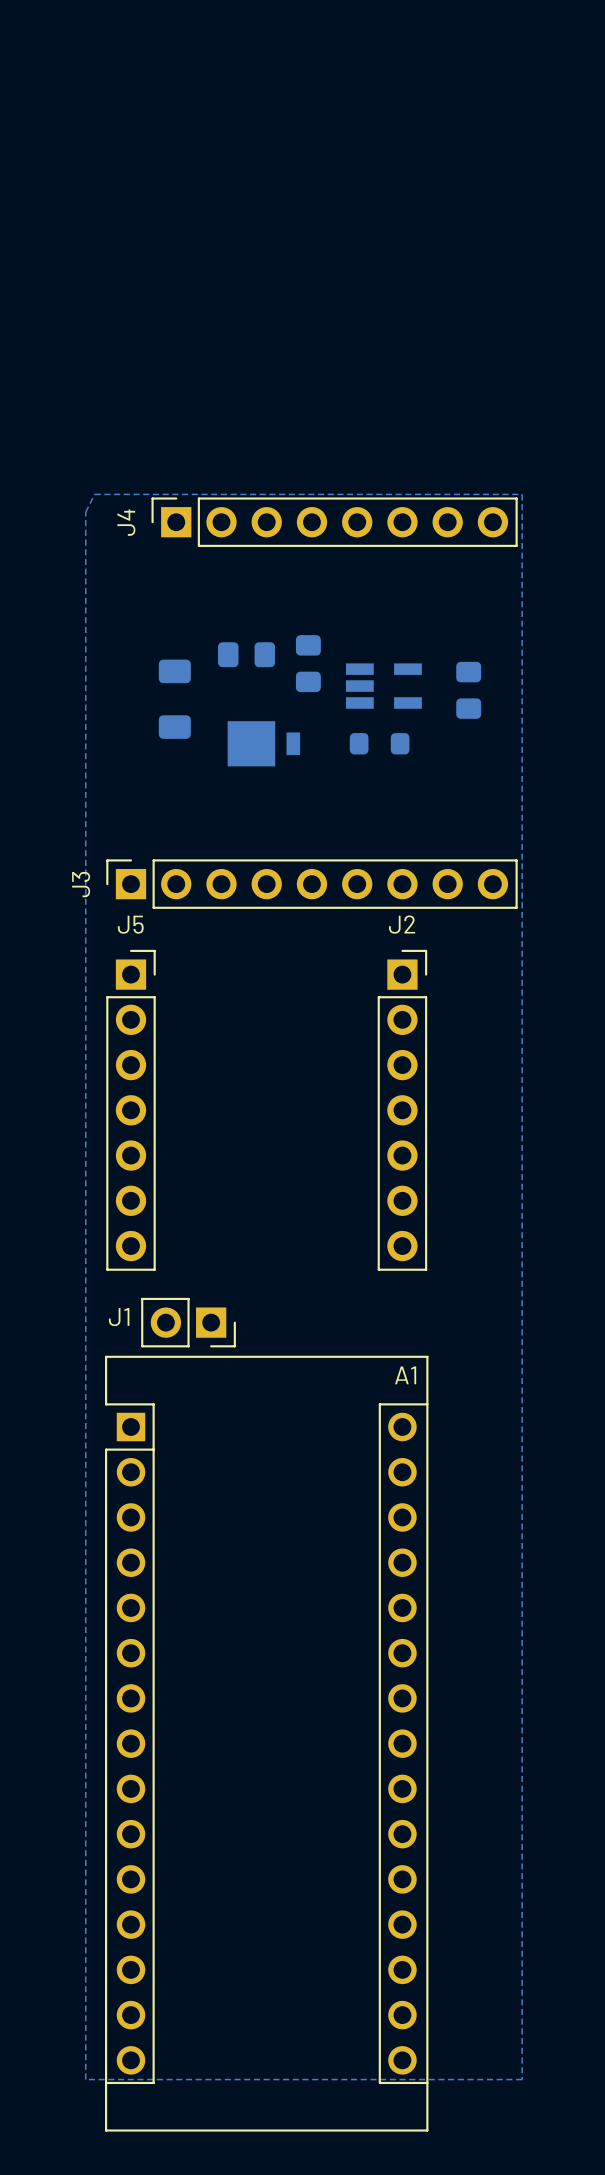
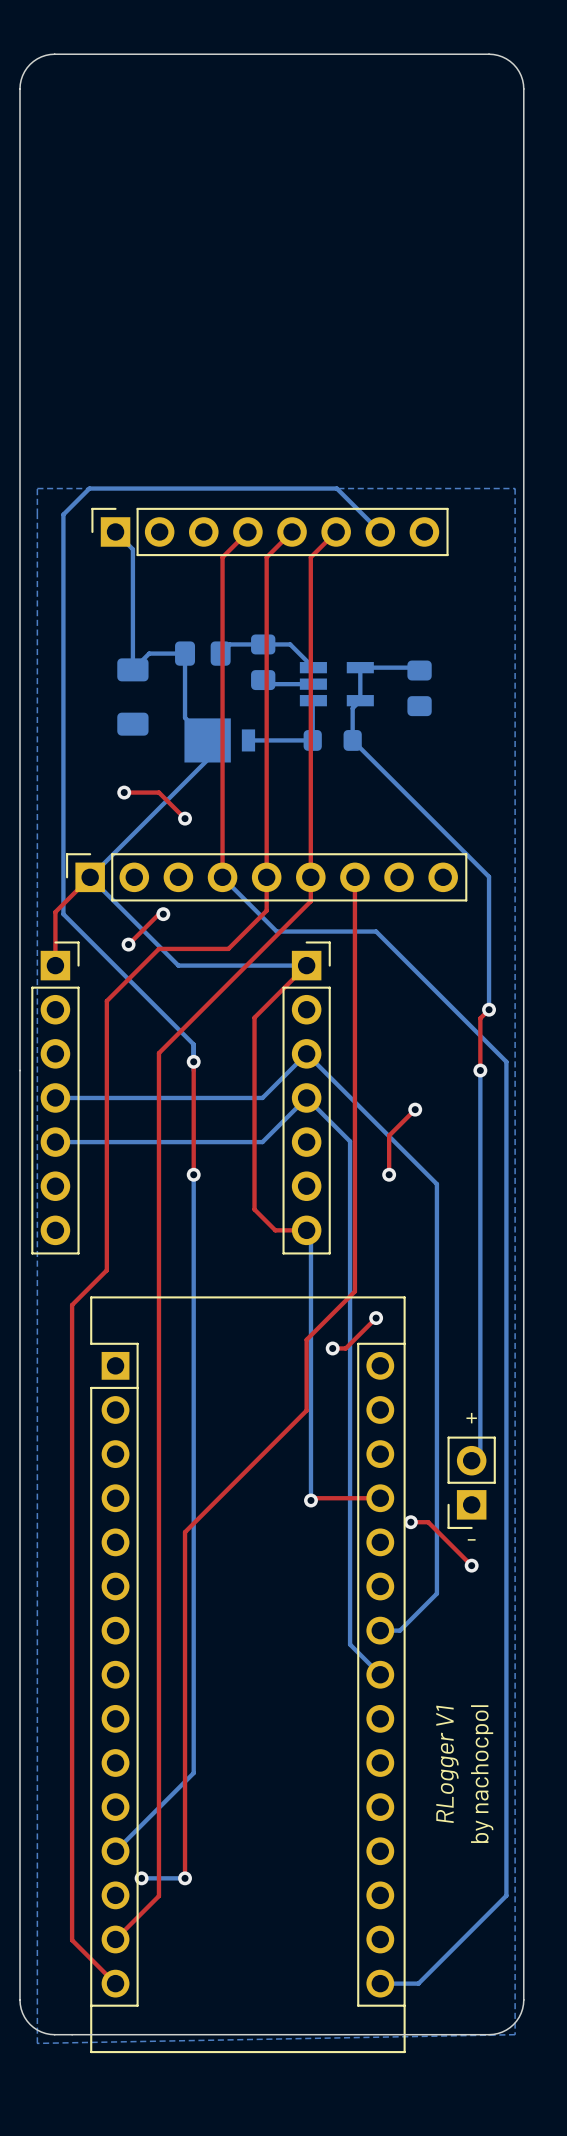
board edge: none -> (54, 54) (489, 54) (502, 56) (510, 61) (519, 71) (522, 79) (523, 1999) (521, 2013) (516, 2021) (506, 2030) (498, 2033) (54, 2034) (41, 2032) (33, 2027) (24, 2017) (21, 2008) (19, 88) (22, 75) (30, 64) (41, 56) (54, 54)
bottom zone outline: (94, 494) (85, 512) (85, 2079) (522, 2079) (522, 494) (94, 494) -> (37, 488) (37, 2043) (515, 2034) (515, 488) (37, 488)
J4: (334, 522) -> none
bottom track: none -> (115, 531) (132, 549) (132, 669) (149, 653) (185, 653) (185, 717) (207, 740) (207, 759) (90, 877) (178, 965) (306, 965)
top track: none -> (247, 531) (222, 557) (222, 877)
part: none -> (269, 531)
top track: none -> (292, 531) (266, 557) (266, 910) (228, 948) (158, 948) (106, 1001) (106, 1270) (72, 1305) (72, 1940) (115, 1983)
top track: none -> (336, 531) (310, 557) (310, 901) (158, 1053) (158, 1896) (115, 1939)
bottom track: none -> (380, 531) (336, 488) (89, 488) (63, 514) (63, 914) (193, 1044) (193, 1070)
bottom track: none -> (220, 653) (229, 644) (290, 644) (313, 667)
bottom track: none -> (419, 670) (416, 667) (360, 667) (360, 700) (352, 708) (352, 740) (489, 876) (489, 1009)
bottom track: none -> (263, 680) (267, 684) (313, 684)
bottom track: none -> (313, 700) (312, 740) (248, 740)
top track: none -> (124, 792) (158, 792) (185, 818)
via: none -> (124, 792)
via: none -> (185, 818)
J3 name: J3 (81, 884) -> none
top track: none -> (90, 877) (55, 912) (55, 965)
bottom track: none -> (222, 877) (276, 931) (376, 931) (506, 1061) (506, 1895) (418, 1983) (380, 1983)
top track: none -> (354, 877) (354, 1291) (306, 1339) (306, 1410) (185, 1532) (185, 1878)
top track: none -> (163, 914) (158, 914) (128, 944)
via: none -> (163, 914)
via: none -> (128, 944)
top track: none -> (306, 965) (254, 1017) (254, 1209) (275, 1230) (306, 1230)
top track: none -> (489, 1009) (480, 1018) (480, 1070)
via: none -> (489, 1009)
top track: none -> (193, 1061) (193, 1174)
via: none -> (193, 1061)
bottom track: none -> (480, 1070) (480, 1452) (471, 1460)
via: none -> (480, 1070)
bottom track: none -> (55, 1097) (262, 1097) (306, 1053) (436, 1184) (436, 1593) (399, 1630) (380, 1630)
part: none -> (55, 1097)
J5: (131, 1110) -> none
part: none -> (306, 1097)
J2: (402, 1110) -> none
top track: none -> (415, 1109) (389, 1135) (389, 1174)
via: none -> (415, 1109)
bottom track: none -> (55, 1142) (262, 1142) (306, 1097) (350, 1141) (350, 1644) (380, 1674)
bottom track: none -> (193, 1174) (193, 1773) (115, 1851)
via: none -> (193, 1174)
via: none -> (389, 1174)
bottom track: none -> (306, 1230) (310, 1234) (310, 1500)
J1: (188, 1322) -> none
top track: none -> (376, 1318) (345, 1348) (332, 1348)
via: none -> (376, 1318)
via: none -> (332, 1348)
text: none -> + (471, 1418)
part: none -> (471, 1482)
top track: none -> (380, 1498) (313, 1498) (310, 1500)
via: none -> (310, 1500)
top track: none -> (410, 1522) (428, 1522) (471, 1565)
via: none -> (410, 1522)
text: none -> - (471, 1539)
via: none -> (471, 1565)
part: none -> (247, 1674)
A1: (266, 1743) -> none
text: none -> RLogger V1 (447, 1764)
text: none -> by nachocpol (482, 1774)
bottom track: none -> (141, 1878) (185, 1878)
via: none -> (141, 1878)
via: none -> (185, 1878)

